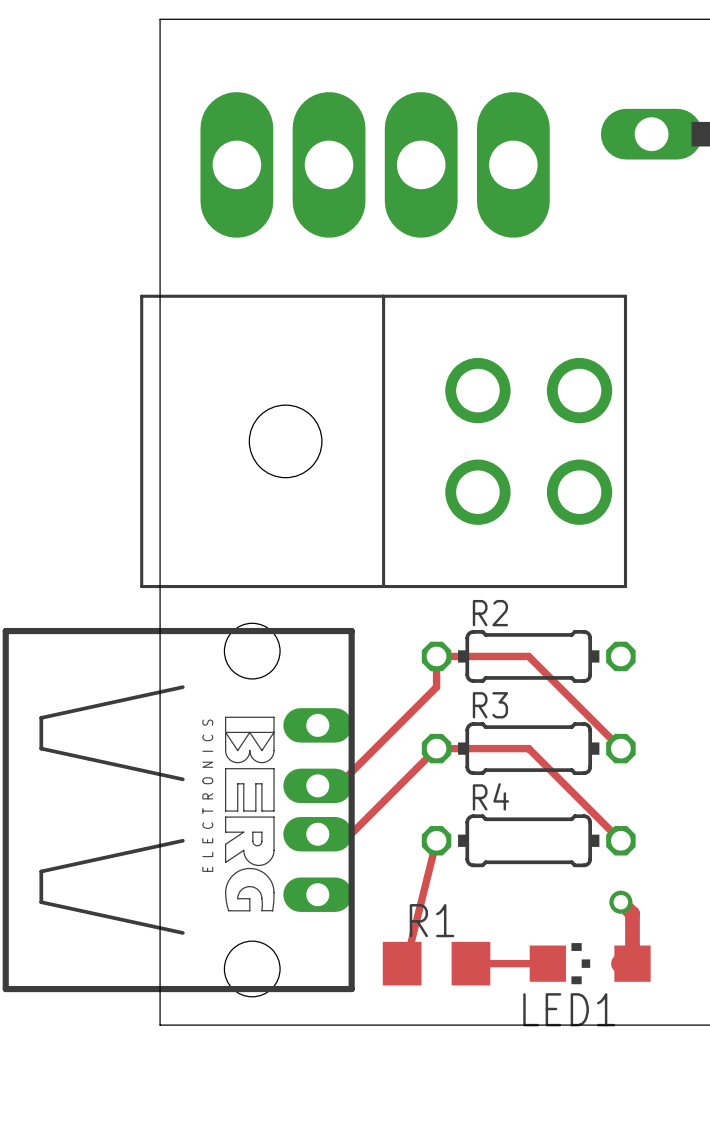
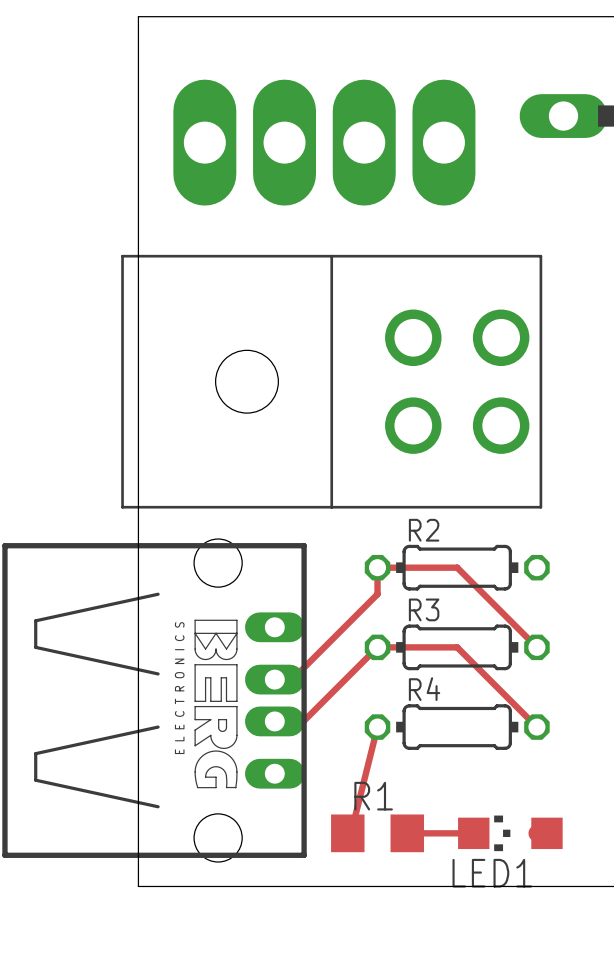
track: (620, 902) (632, 913) (632, 963) -> none
via: (620, 902) -> none

